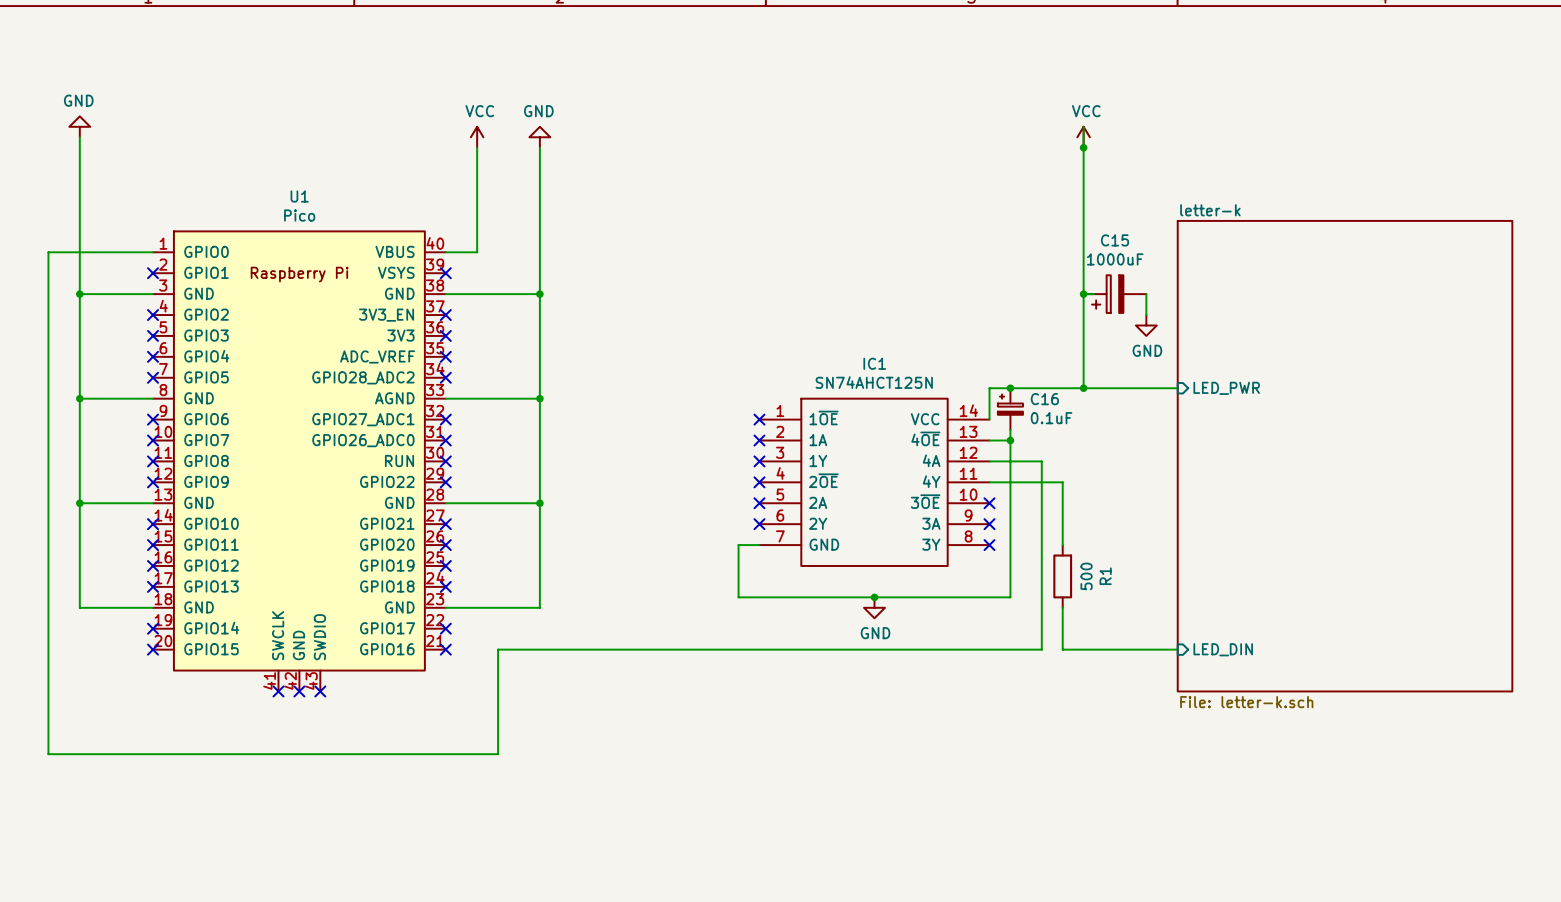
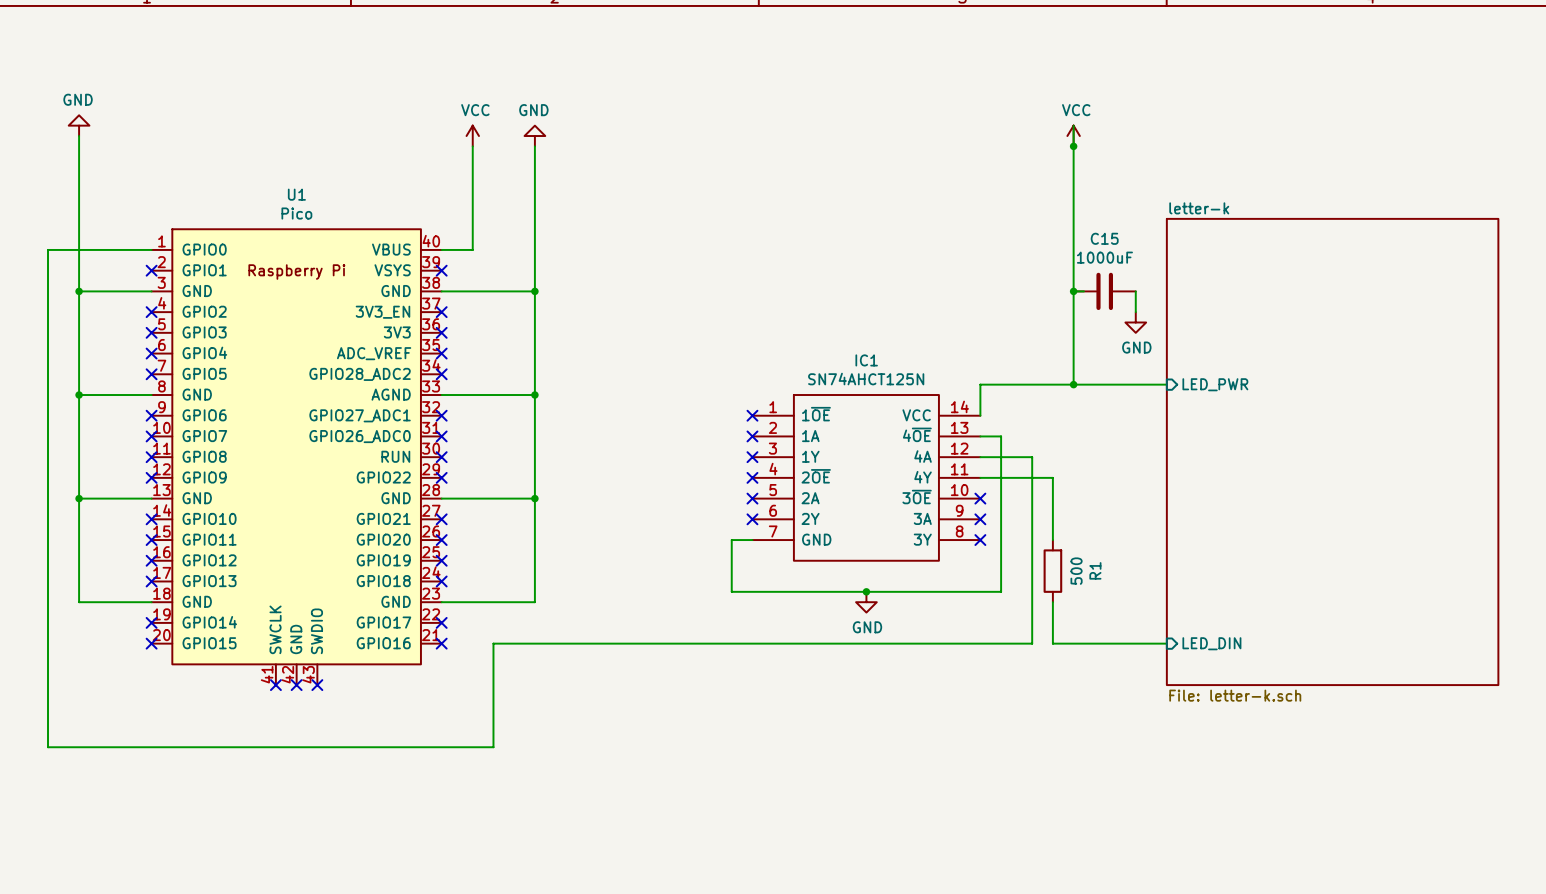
C15 symbol: [1083, 275, 1147, 313] -> [1073, 272, 1136, 311]
junction: (1010, 388) -> none
C16: 0.1uF (1010, 409) -> none
wire: (1010, 430) (1010, 440) -> none
junction: (1010, 440) -> none

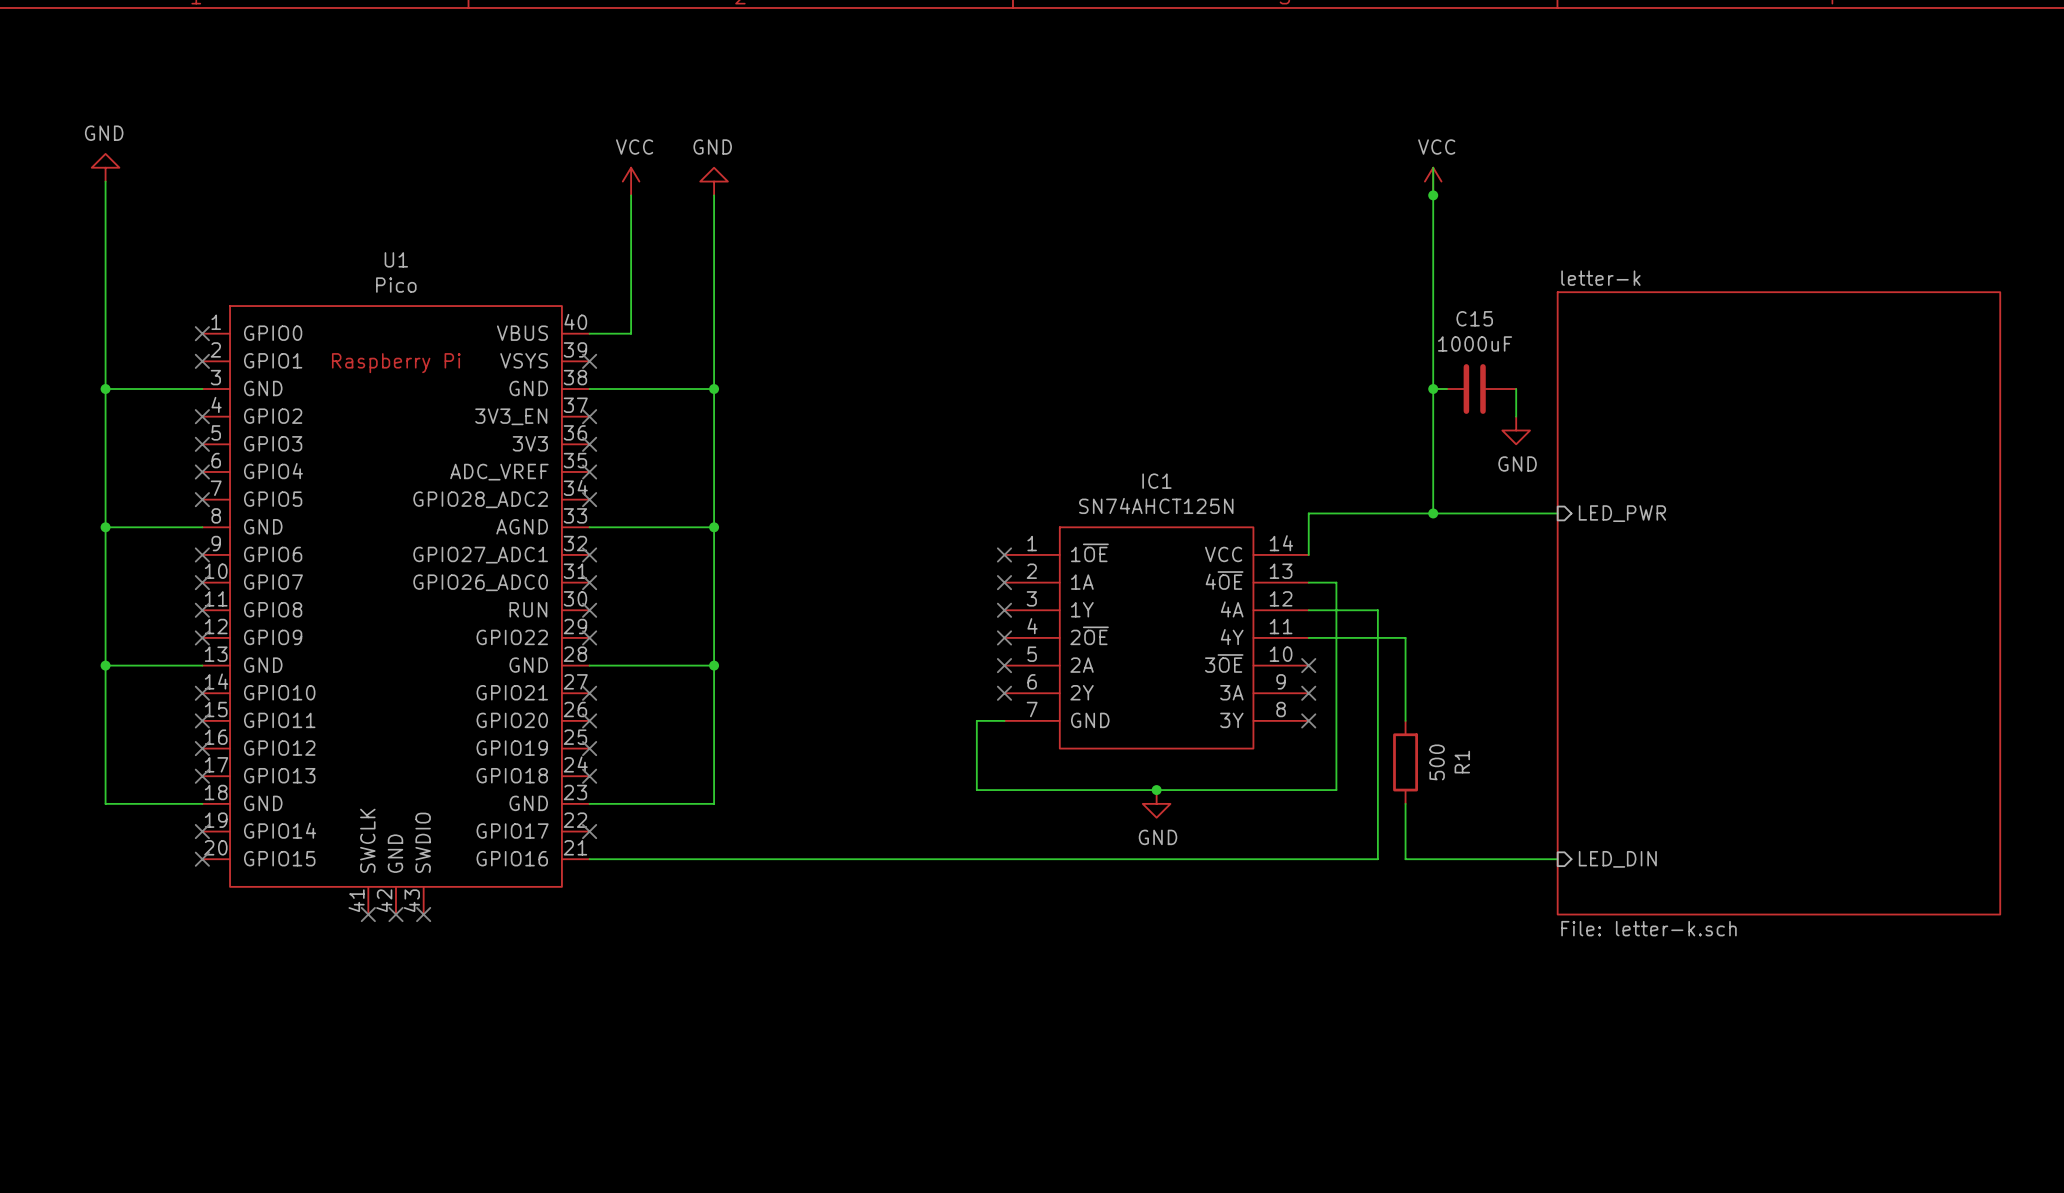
wire: (151, 249) (48, 249) (48, 747) (493, 747) (493, 643) -> (589, 859) (658, 859)
no-connect mark: none -> (202, 333)
no-connect mark: (441, 643) -> none

